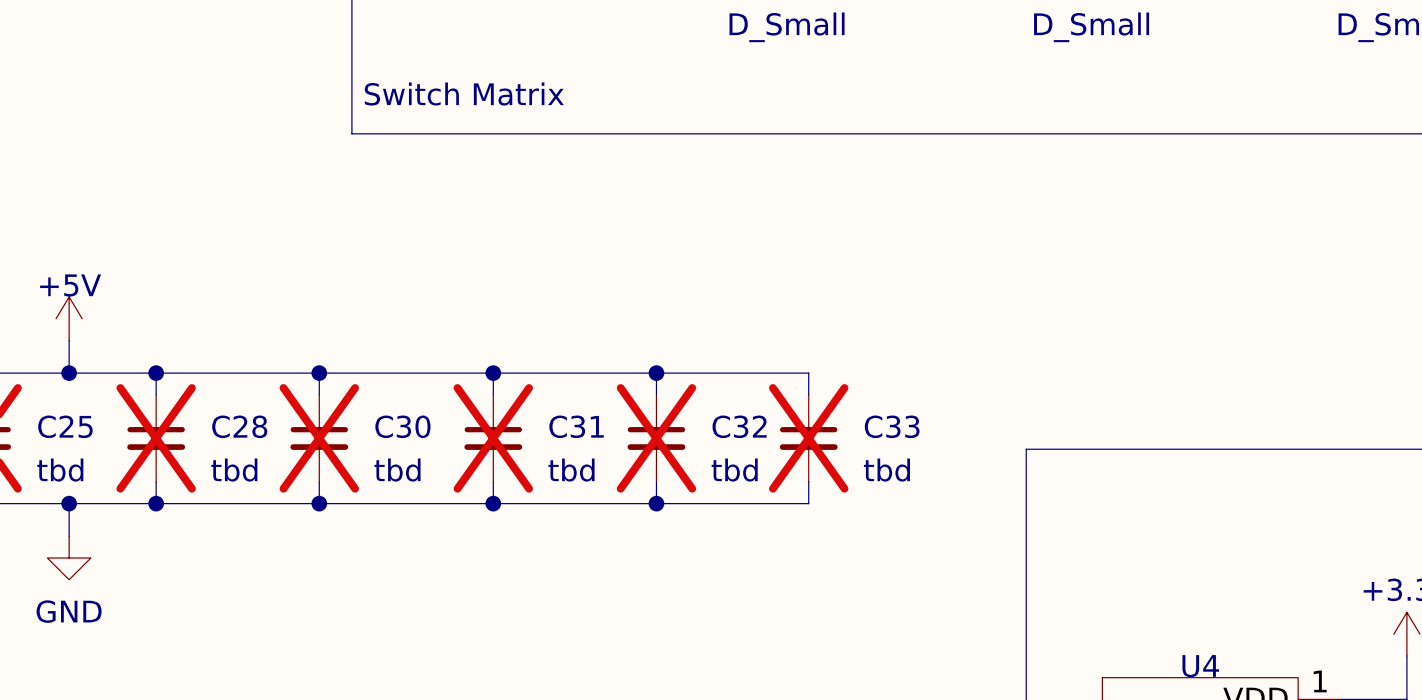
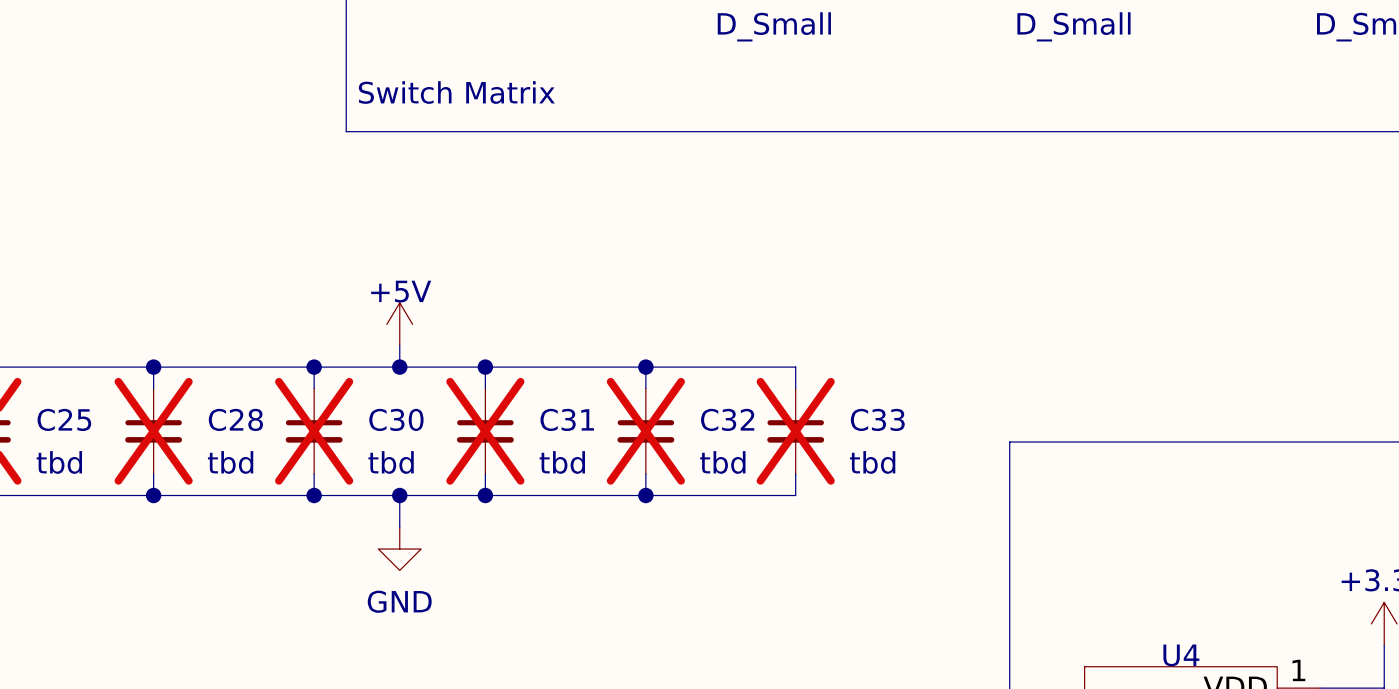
power symbol position: +5V (69, 318) -> +5V (399, 324)
wire: (69, 340) (69, 373) -> none
wire: none -> (399, 345) (399, 367)
junction: (69, 373) -> none
junction: none -> (399, 367)
wire: (69, 503) (69, 536) -> (399, 495) (399, 527)
junction: (69, 503) -> none
junction: none -> (399, 495)
power symbol position: GND (69, 558) -> GND (399, 549)

